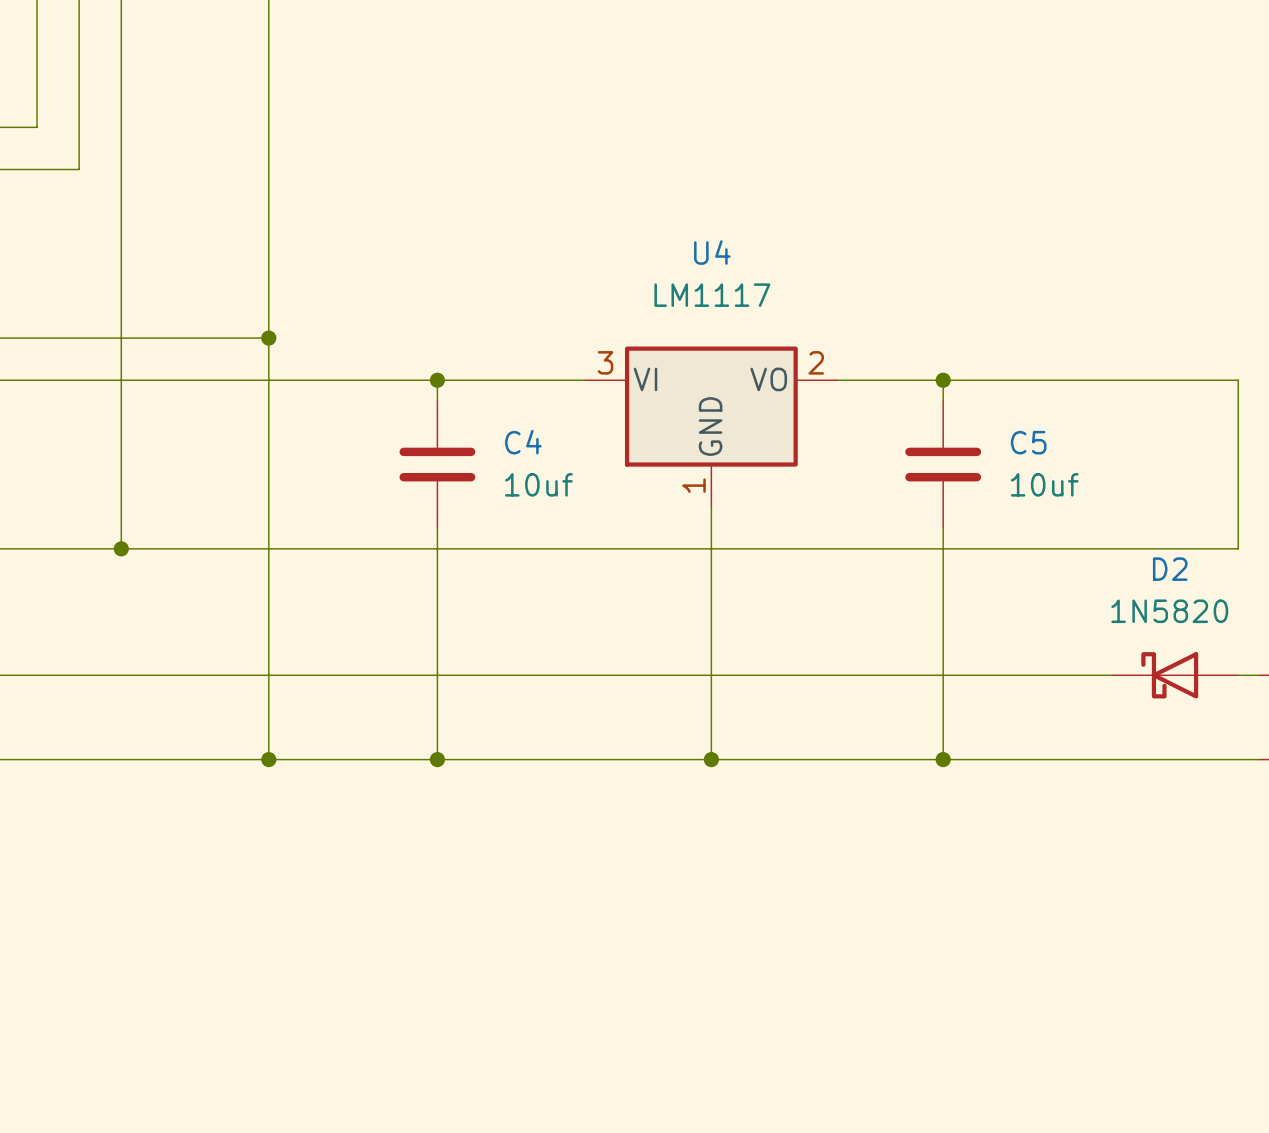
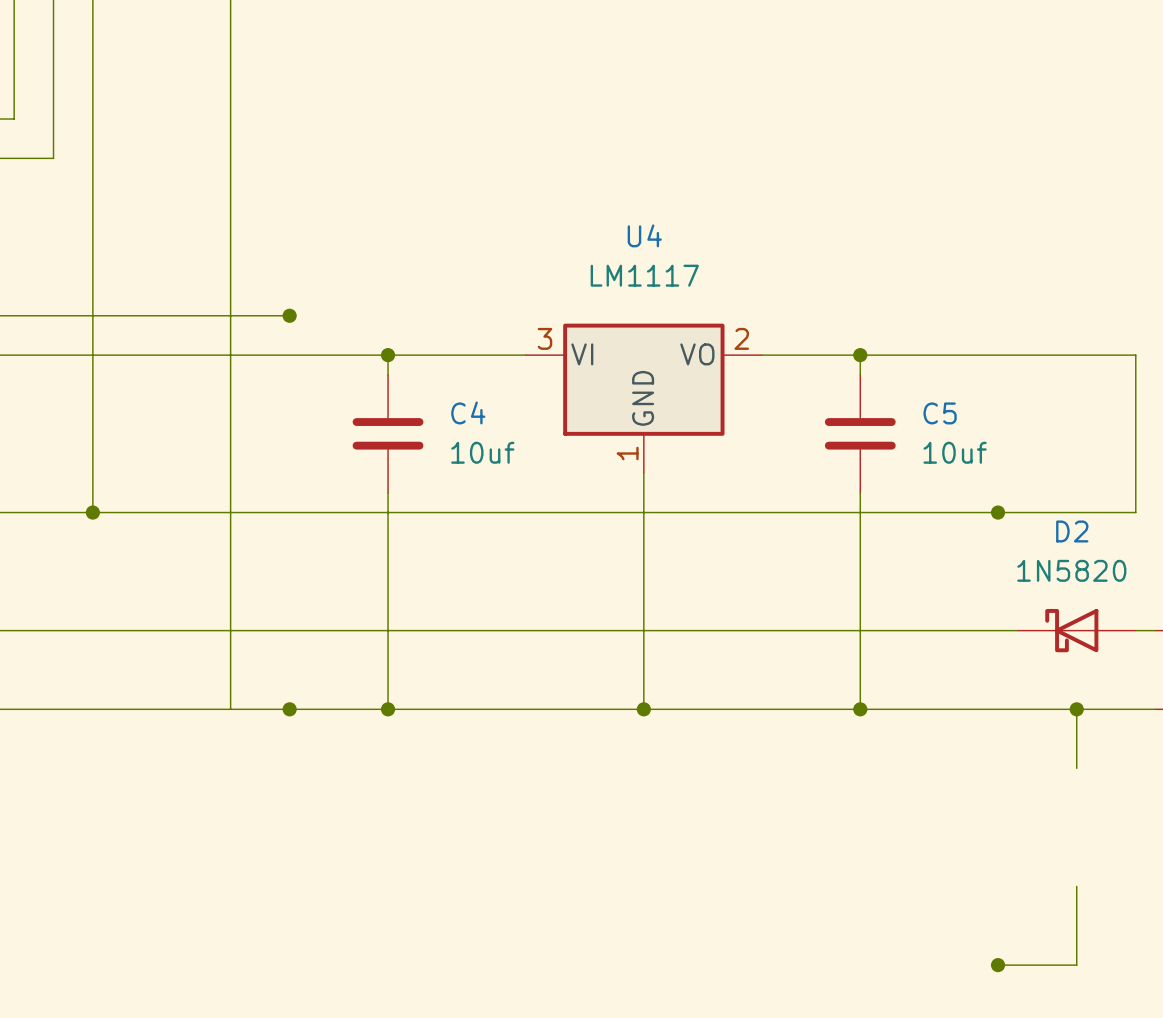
wire: none -> (230, 315) (289, 315)
junction position: (268, 338) -> (289, 315)
junction: none -> (998, 512)
junction position: (268, 759) -> (289, 709)
wire: none -> (1076, 709) (1076, 768)
junction: none -> (1076, 709)
wire: none -> (1076, 886) (1076, 965) (998, 965)
junction: none -> (998, 965)

